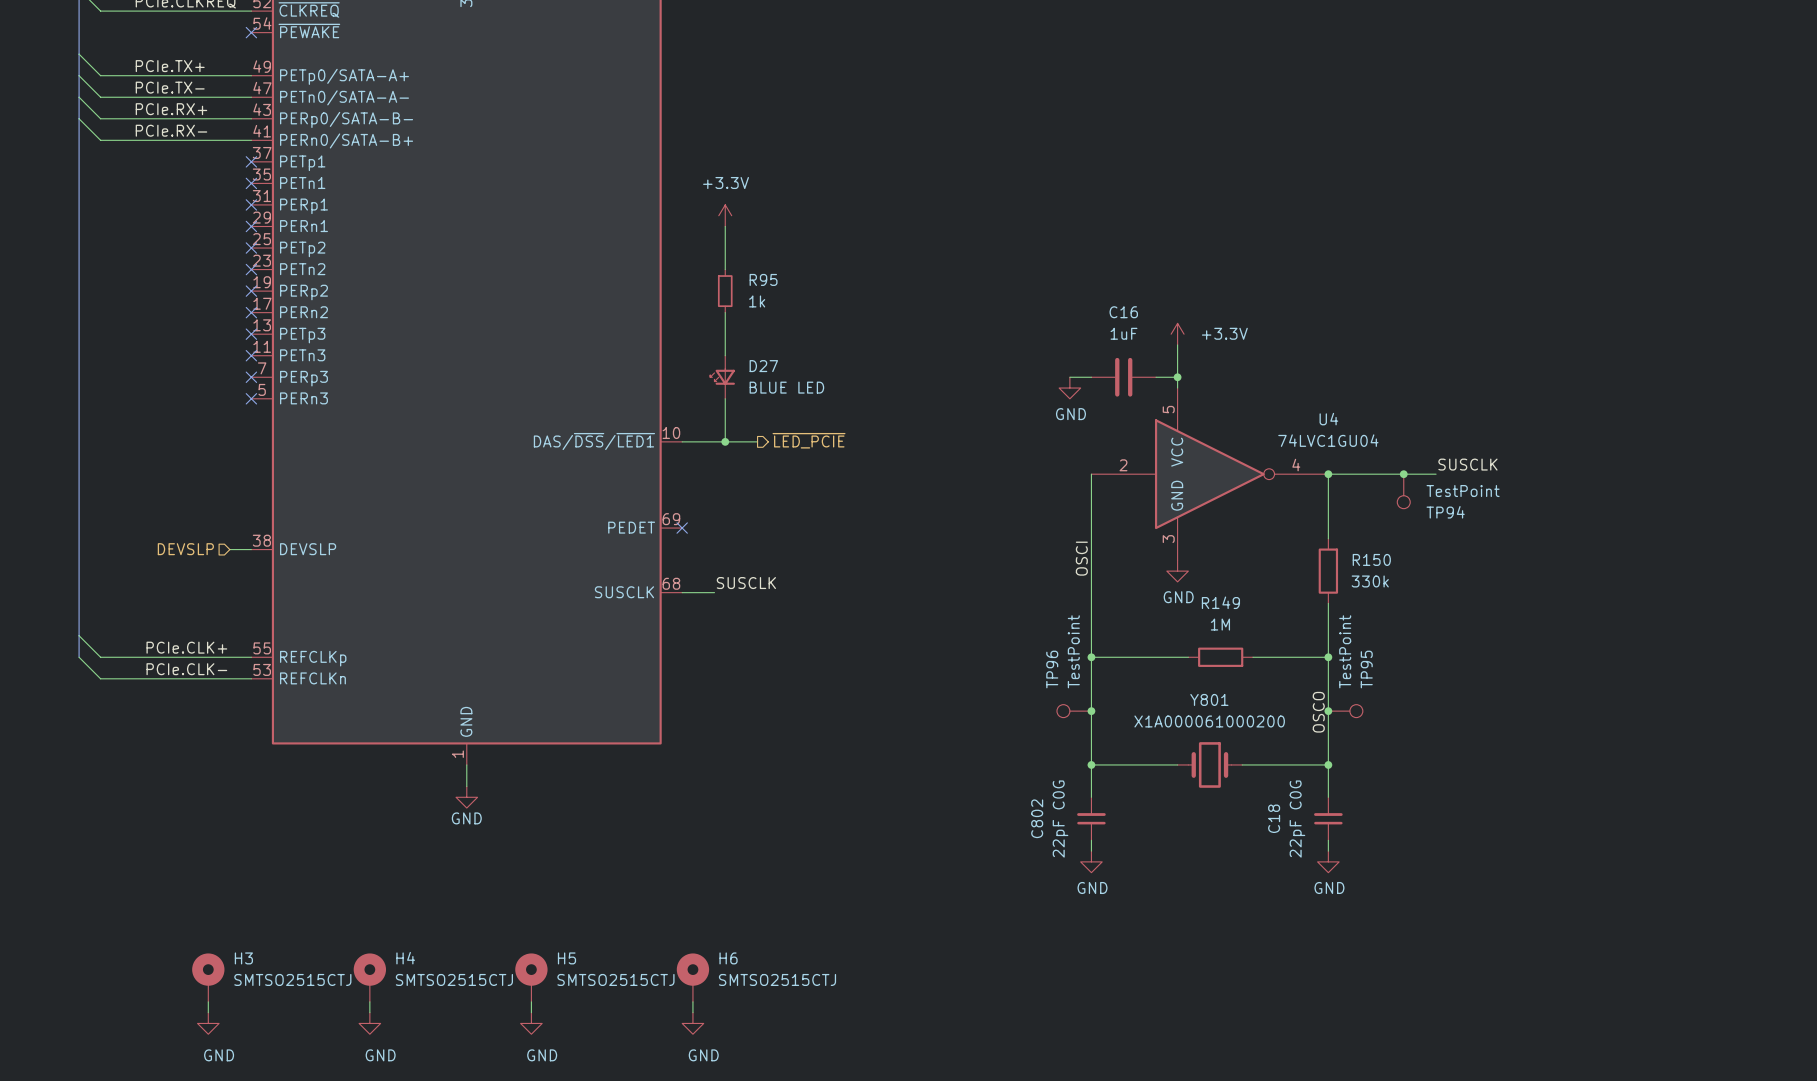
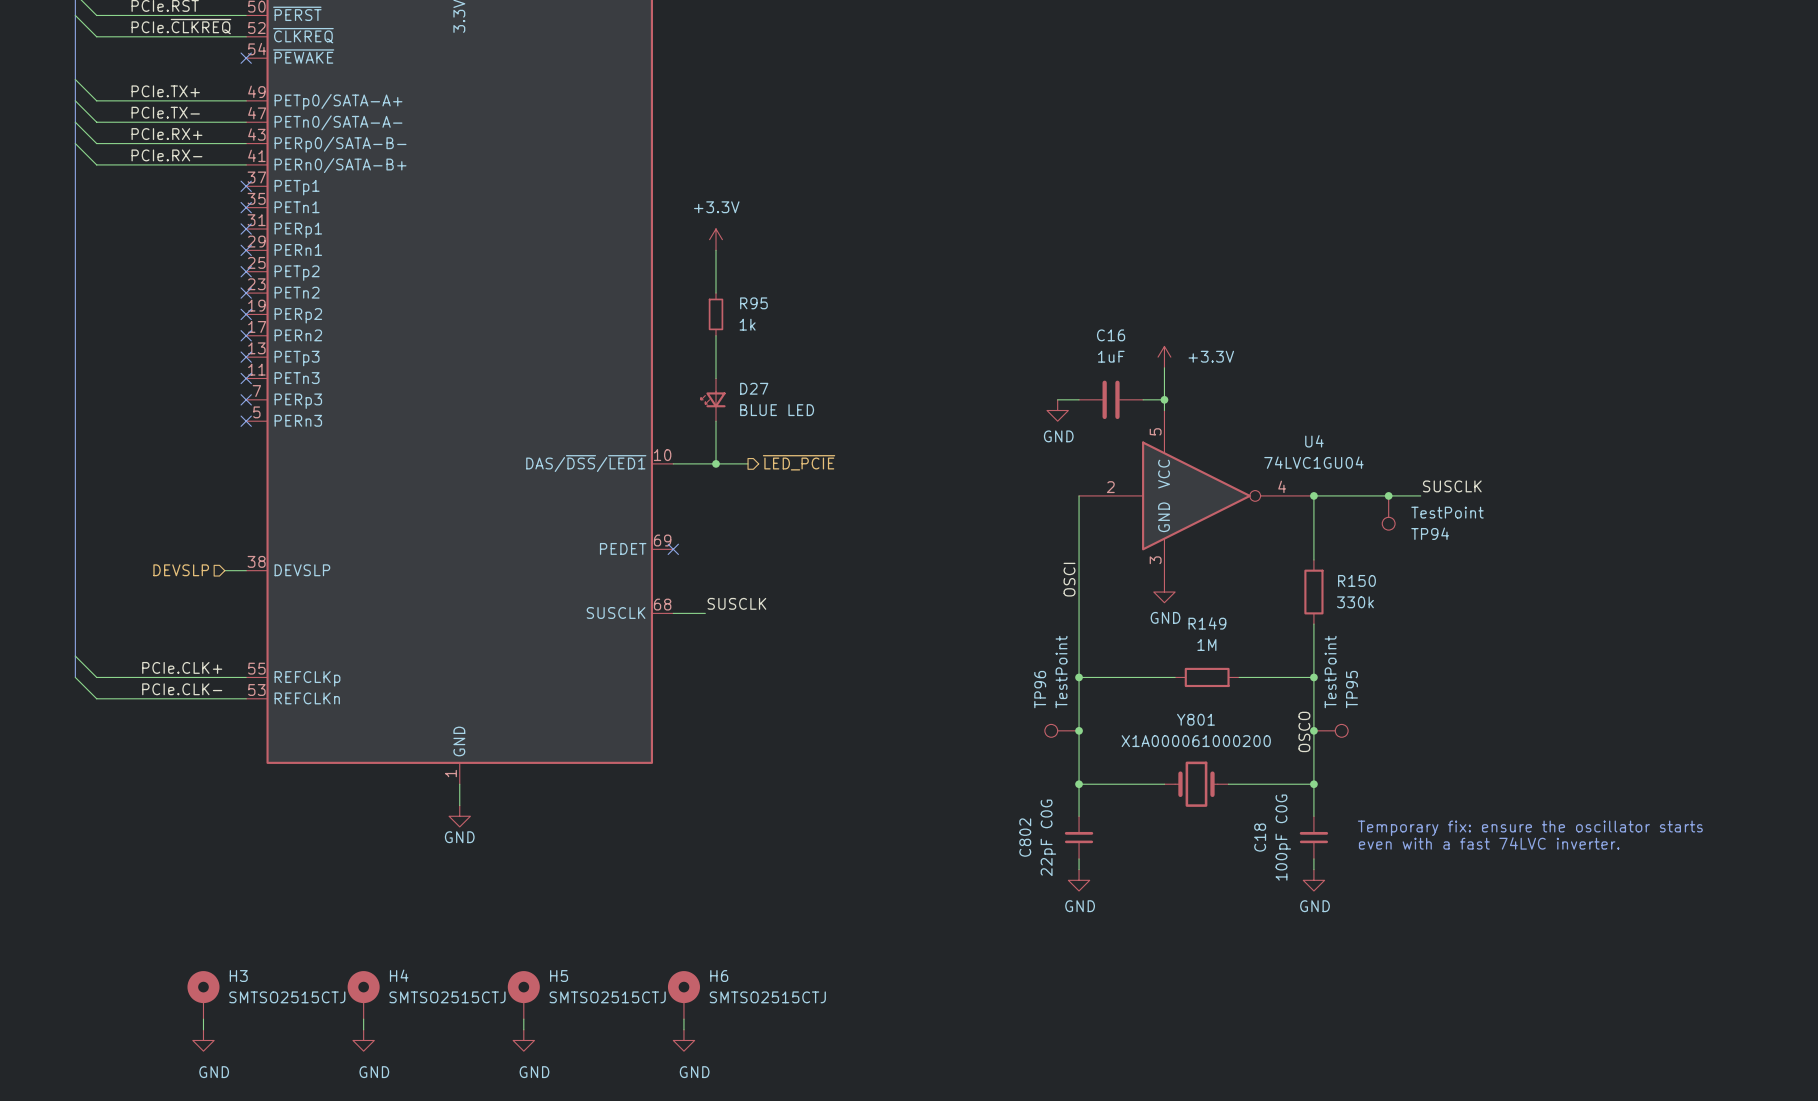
text: none -> Temporary fix: ensure the oscillator starts (1530, 828)
C18 value: 22pF C0G (1297, 819) -> 100pF C0G (1283, 837)
text: none -> even with a fast 74LVC inverter. (1489, 843)

